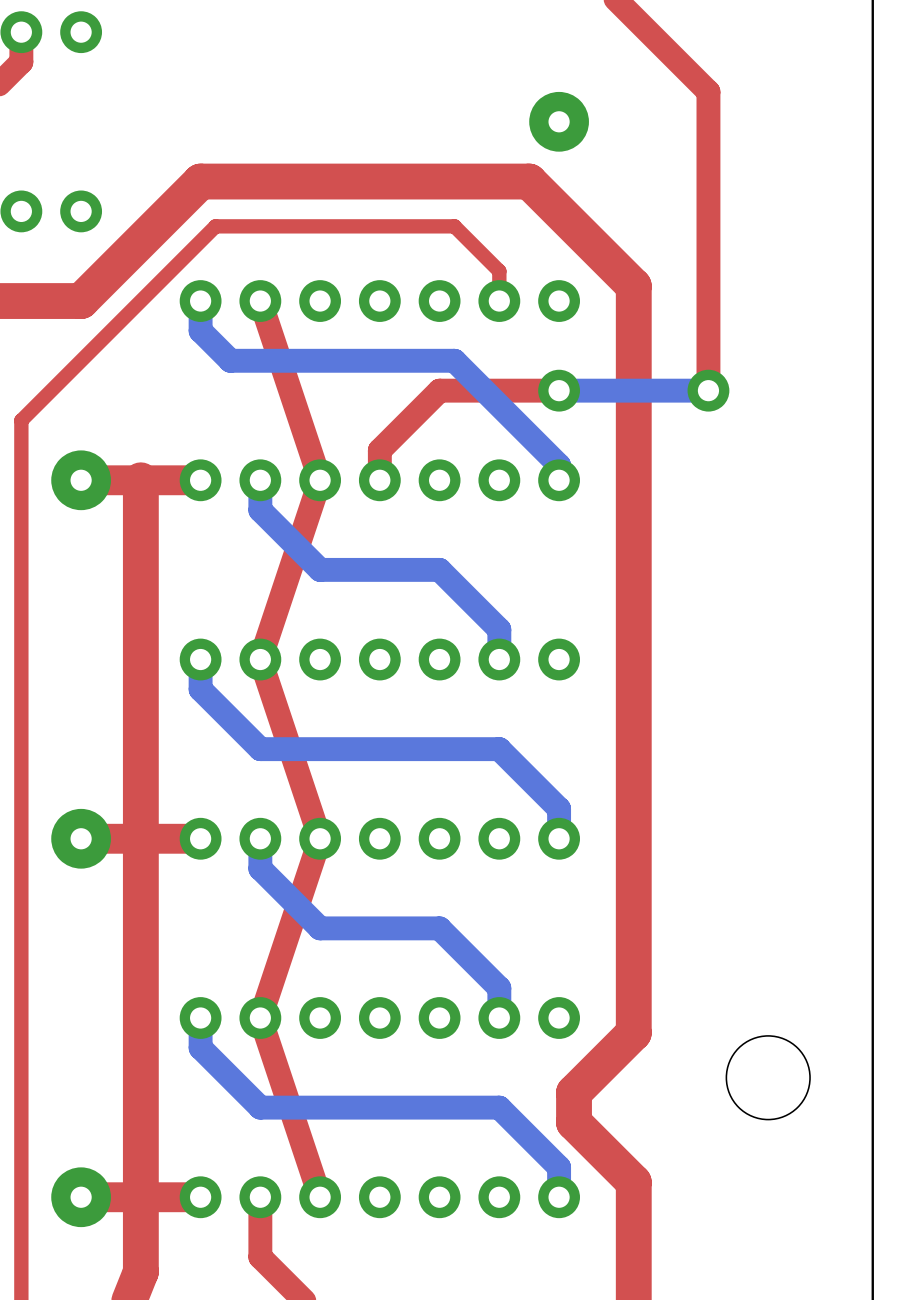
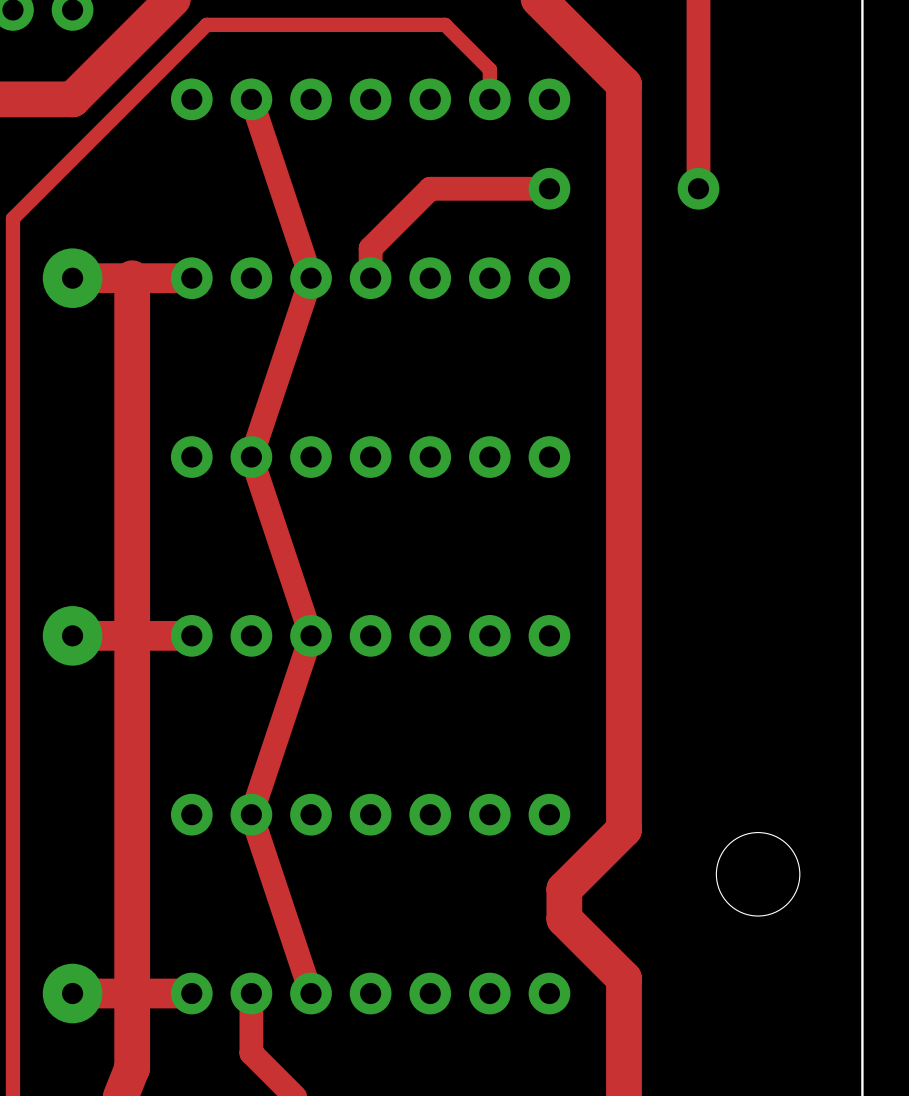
bottom track: (200, 301) (200, 330) (230, 360) (454, 360) (559, 465) (559, 480) -> none
bottom track: (708, 390) (559, 390) -> none
bottom track: (260, 480) (260, 510) (320, 569) (439, 569) (499, 629) (499, 659) -> none
bottom track: (200, 659) (200, 689) (260, 749) (499, 749) (559, 808) (559, 838) -> none
bottom track: (260, 838) (260, 868) (320, 928) (439, 928) (499, 988) (499, 1018) -> none
bottom track: (200, 1018) (200, 1047) (260, 1107) (499, 1107) (559, 1167) (559, 1197) -> none

